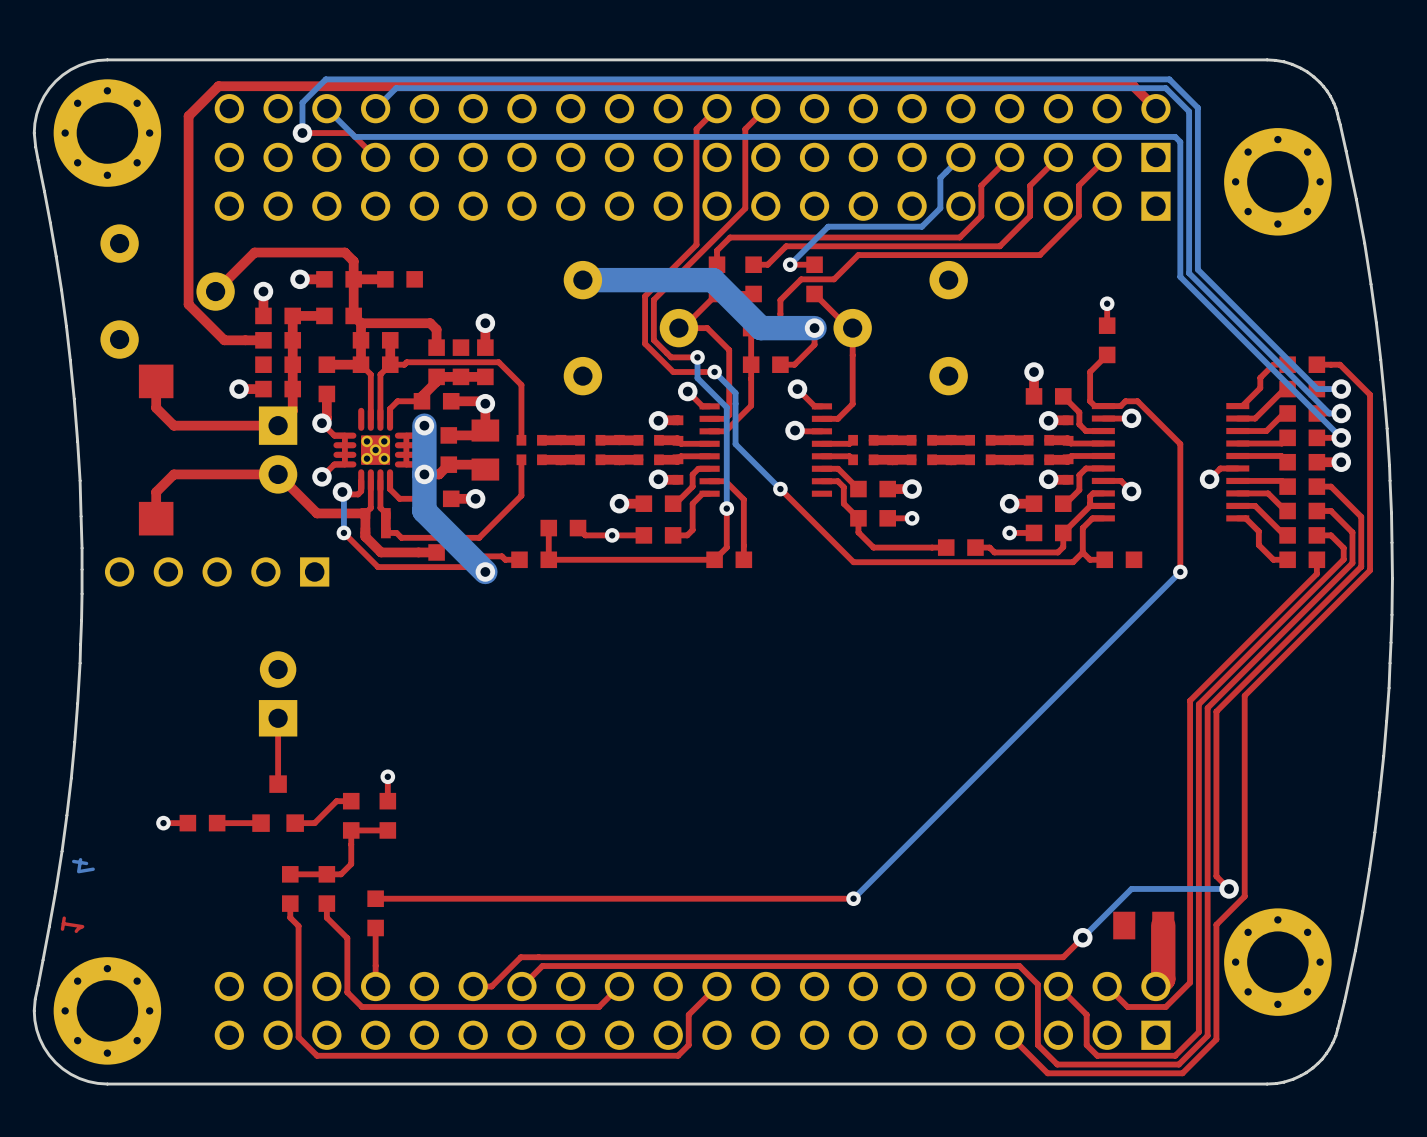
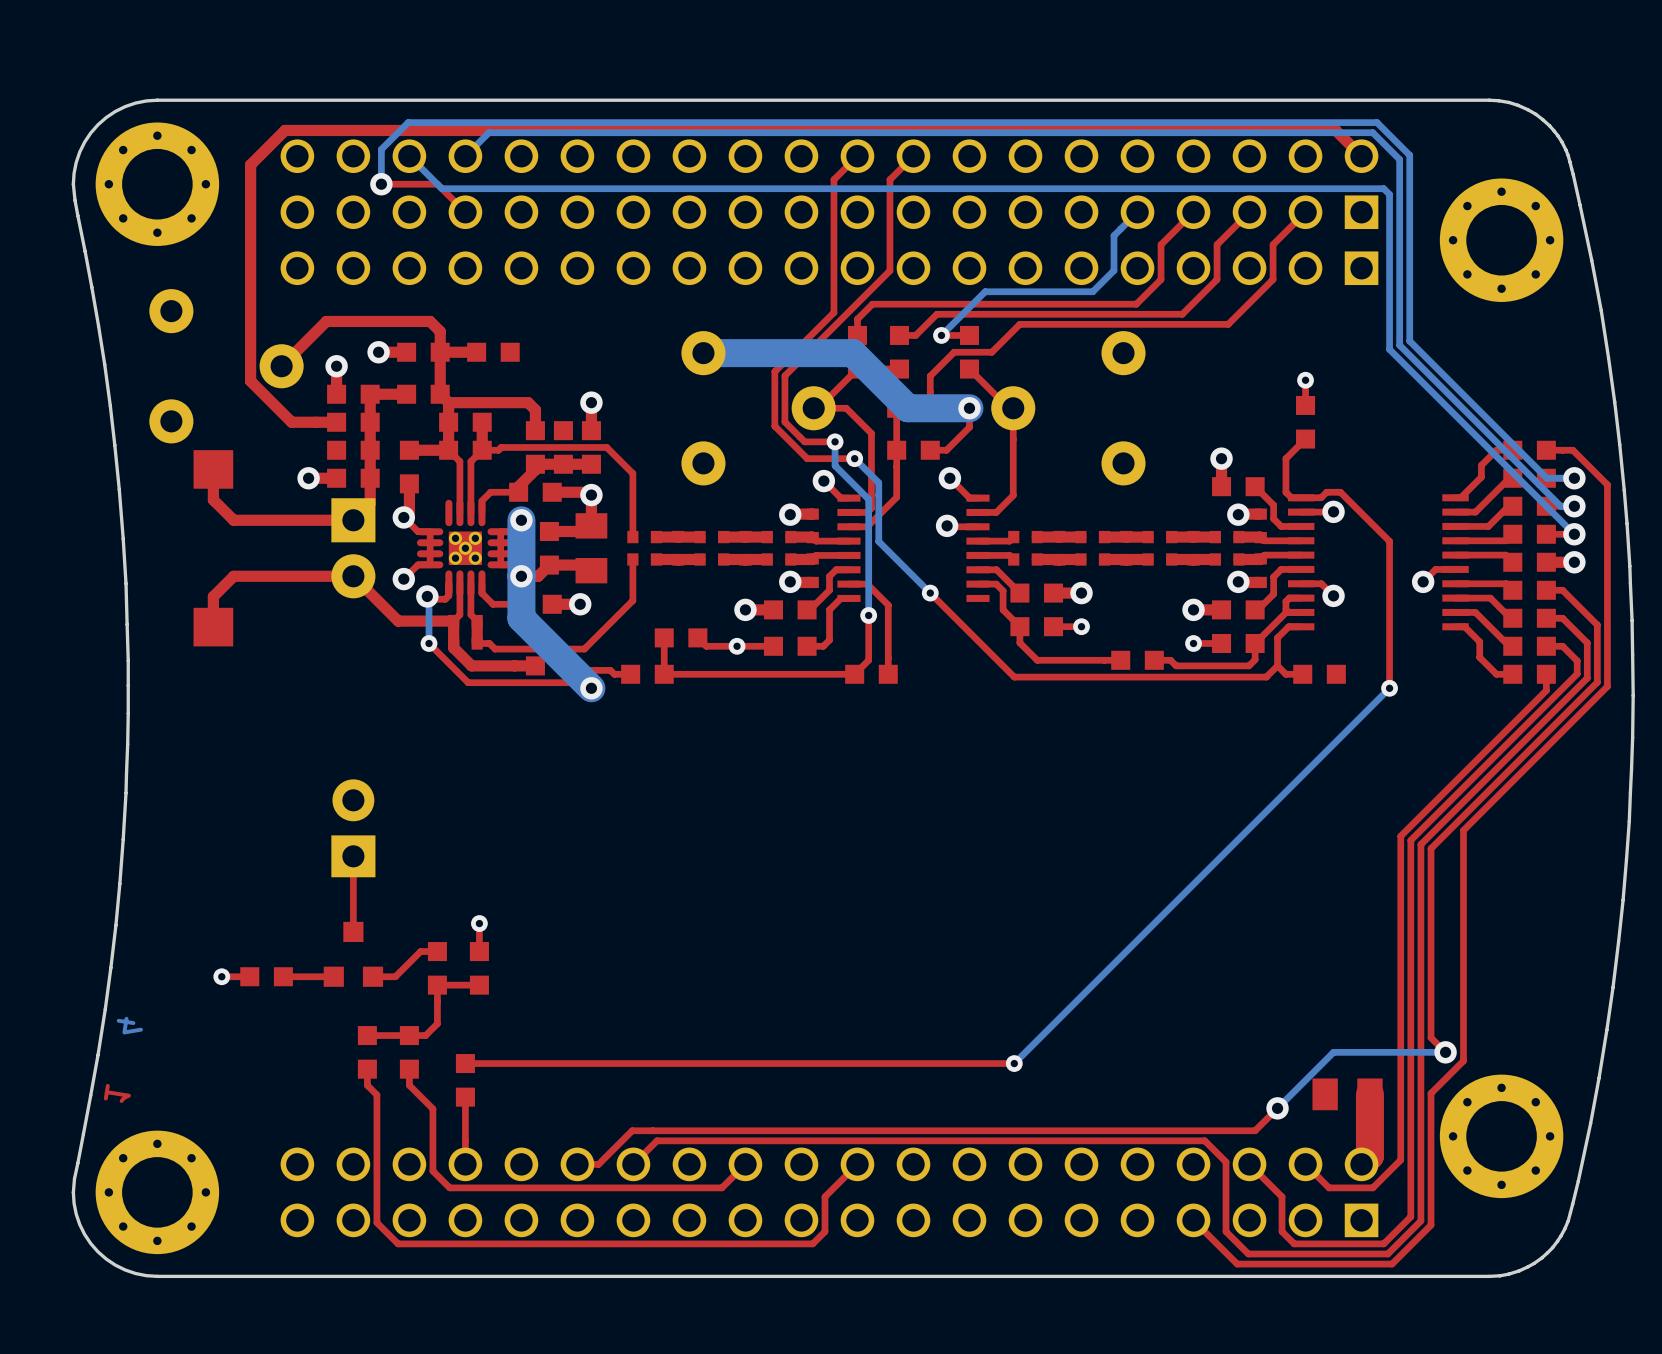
part: (217, 571) -> none

